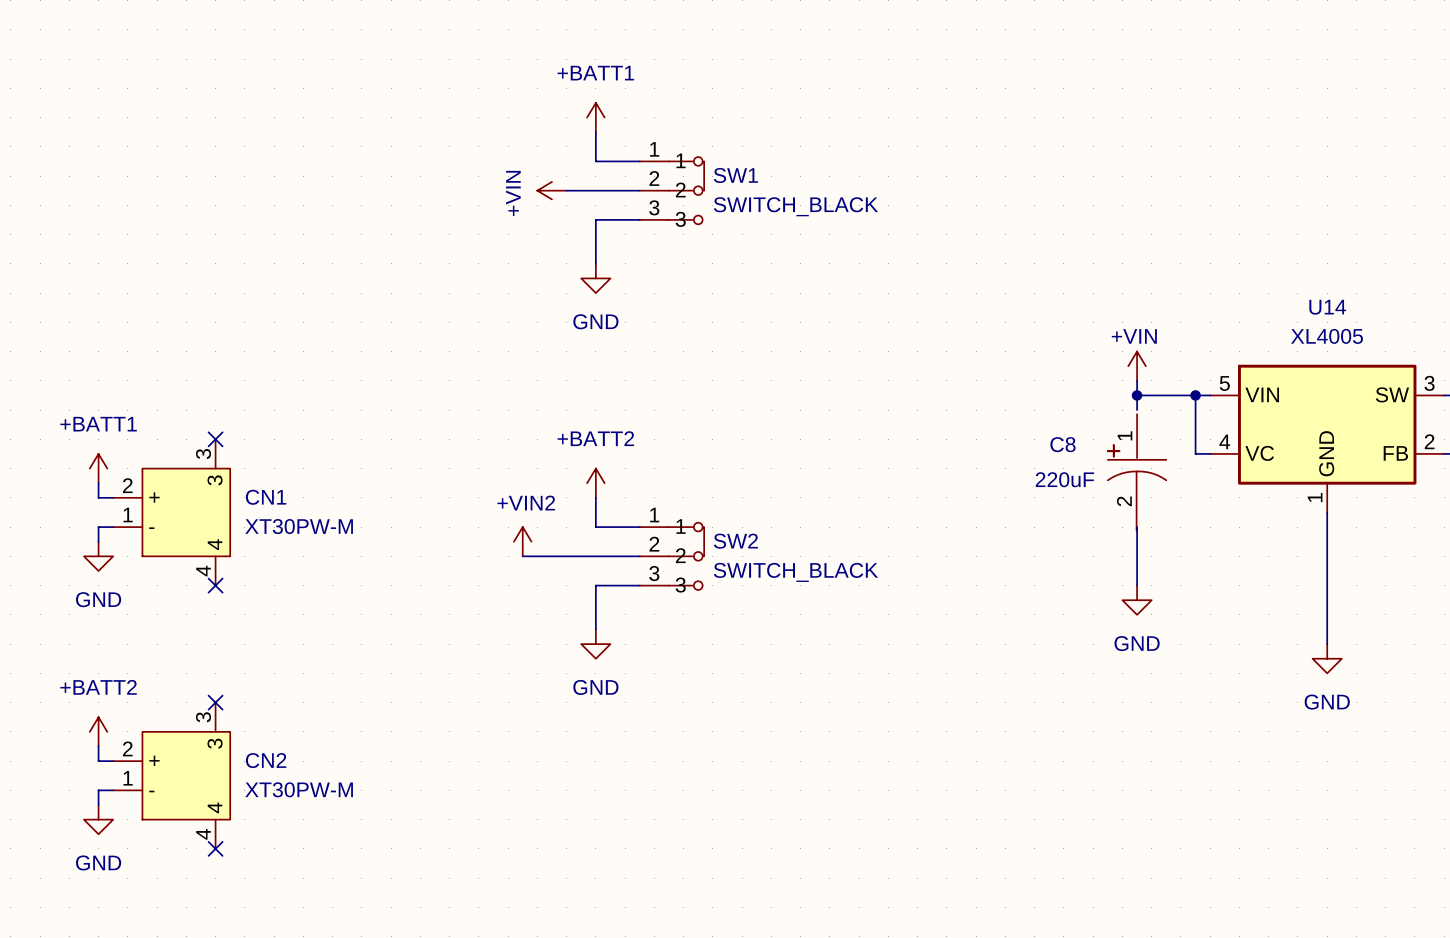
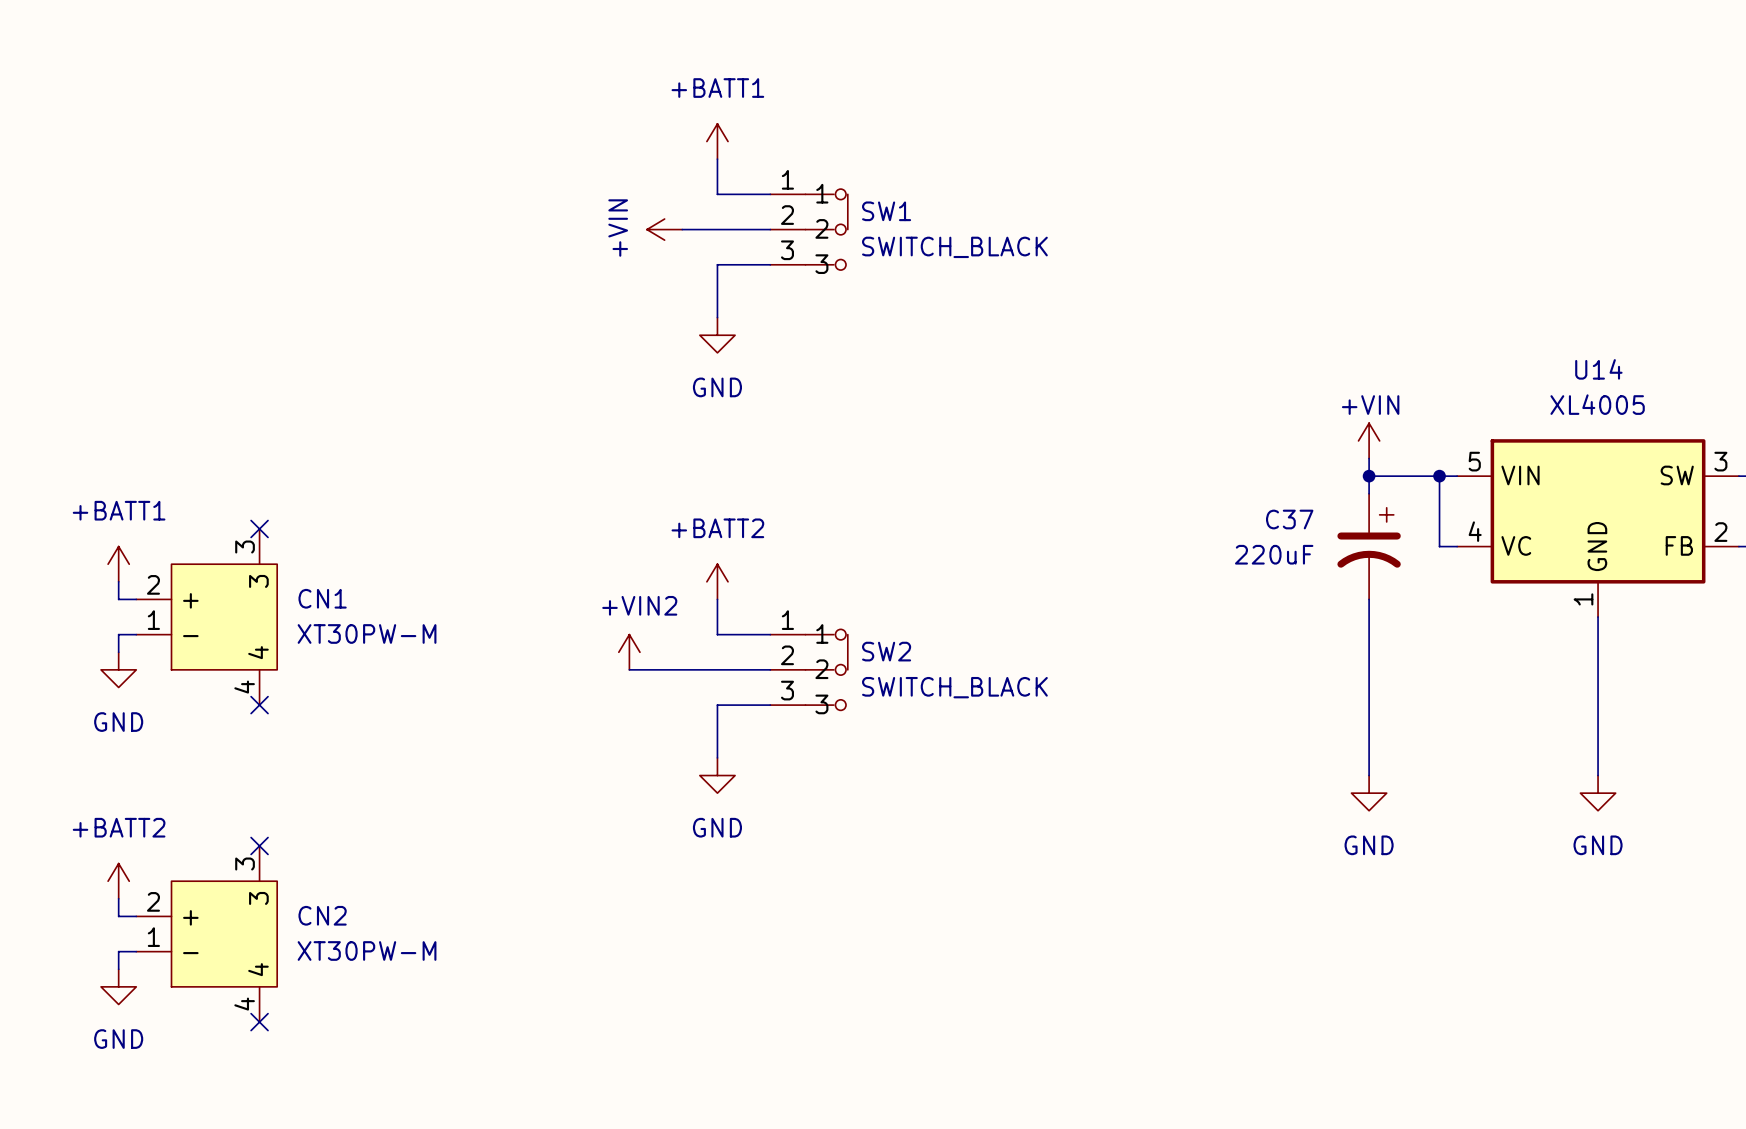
C37: none -> 220uF (1369, 546)
C8: 220uF (1137, 472) -> none
wire: none -> (1369, 705) (1369, 775)
power symbol position: GND (1137, 600) -> GND (1369, 793)

